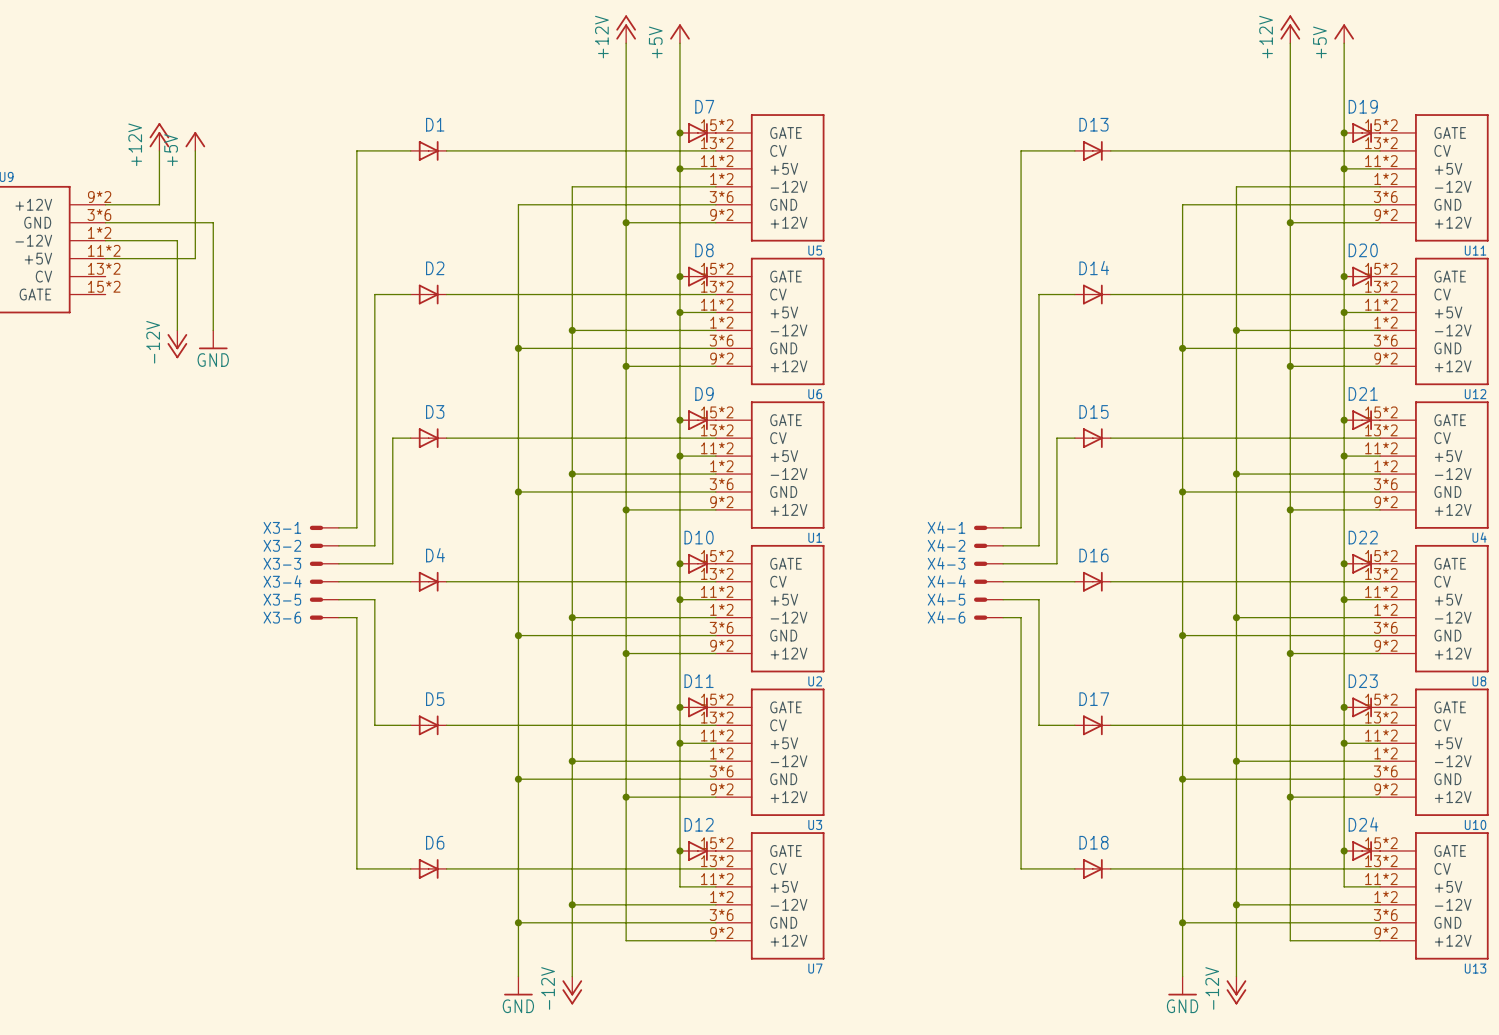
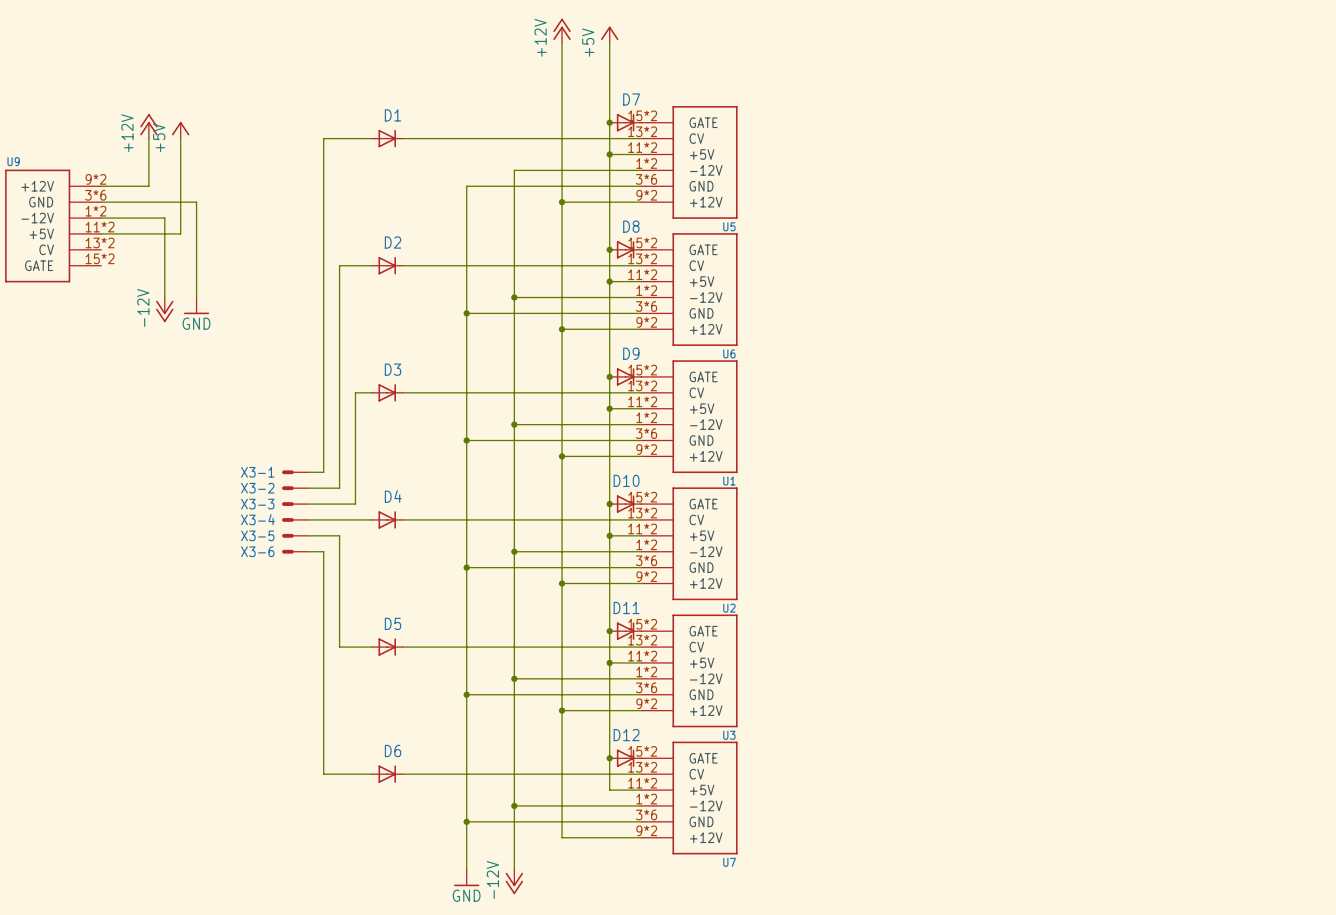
power symbol: +12V (1290, 29) -> none
power symbol: +5V (1344, 33) -> none
wire: (1290, 43) (1290, 940) (1380, 940) -> none
wire: (1344, 43) (1344, 886) (1380, 886) -> none
junction: (1344, 132) -> none
D19: (1362, 132) -> none
wire: (1074, 150) (1021, 150) (1021, 527) (1003, 527) -> none
D13: (1092, 150) -> none
wire: (1110, 150) (1380, 150) -> none
wire: (1344, 168) (1380, 168) -> none
junction: (1344, 168) -> none
U11: (1434, 177) -> none
wire: (1380, 186) (1236, 186) (1236, 976) -> none
wire: (1380, 204) (1182, 204) (1182, 976) -> none
wire: (1290, 222) (1380, 222) -> none
junction: (1290, 222) -> none
junction: (1344, 276) -> none
D20: (1362, 276) -> none
wire: (1074, 294) (1038, 294) (1038, 545) (1003, 545) -> none
D14: (1092, 294) -> none
wire: (1110, 294) (1380, 294) -> none
wire: (1344, 312) (1380, 312) -> none
junction: (1344, 312) -> none
U12: (1434, 321) -> none
wire: (1236, 330) (1380, 330) -> none
junction: (1236, 330) -> none
wire: (1182, 348) (1380, 348) -> none
junction: (1182, 348) -> none
wire: (1290, 366) (1380, 366) -> none
junction: (1290, 366) -> none
junction: (1344, 420) -> none
D21: (1362, 420) -> none
wire: (1074, 438) (1056, 438) (1056, 563) (1003, 563) -> none
D15: (1092, 438) -> none
wire: (1110, 438) (1380, 438) -> none
wire: (1344, 456) (1380, 456) -> none
junction: (1344, 456) -> none
U4: (1434, 465) -> none
wire: (1236, 474) (1380, 474) -> none
junction: (1236, 474) -> none
wire: (1182, 491) (1380, 491) -> none
junction: (1182, 491) -> none
wire: (1290, 509) (1380, 509) -> none
junction: (1290, 509) -> none
X4-1: (988, 527) -> none
X4-2: (988, 545) -> none
X4-3: (988, 563) -> none
junction: (1344, 563) -> none
D22: (1362, 563) -> none
X4-4: (988, 581) -> none
wire: (1003, 581) (1074, 581) -> none
D16: (1092, 581) -> none
wire: (1110, 581) (1380, 581) -> none
X4-5: (988, 599) -> none
wire: (1003, 599) (1038, 599) (1038, 725) (1074, 725) -> none
wire: (1344, 599) (1380, 599) -> none
junction: (1344, 599) -> none
U8: (1434, 608) -> none
X4-6: (988, 617) -> none
wire: (1003, 617) (1021, 617) (1021, 868) (1074, 868) -> none
wire: (1236, 617) (1380, 617) -> none
junction: (1236, 617) -> none
wire: (1182, 635) (1380, 635) -> none
junction: (1182, 635) -> none
wire: (1290, 653) (1380, 653) -> none
junction: (1290, 653) -> none
junction: (1344, 707) -> none
D23: (1362, 707) -> none
D17: (1092, 725) -> none
wire: (1110, 725) (1380, 725) -> none
wire: (1344, 743) (1380, 743) -> none
junction: (1344, 743) -> none
U10: (1434, 752) -> none
wire: (1236, 761) (1380, 761) -> none
junction: (1236, 761) -> none
wire: (1182, 779) (1380, 779) -> none
junction: (1182, 779) -> none
wire: (1290, 797) (1380, 797) -> none
junction: (1290, 797) -> none
junction: (1344, 850) -> none
D24: (1362, 850) -> none
D18: (1092, 868) -> none
wire: (1110, 868) (1380, 868) -> none
U13: (1434, 895) -> none
wire: (1236, 904) (1380, 904) -> none
junction: (1236, 904) -> none
wire: (1182, 922) (1380, 922) -> none
junction: (1182, 922) -> none
power symbol: GND (1182, 986) -> none
power symbol: -12V (1236, 990) -> none

